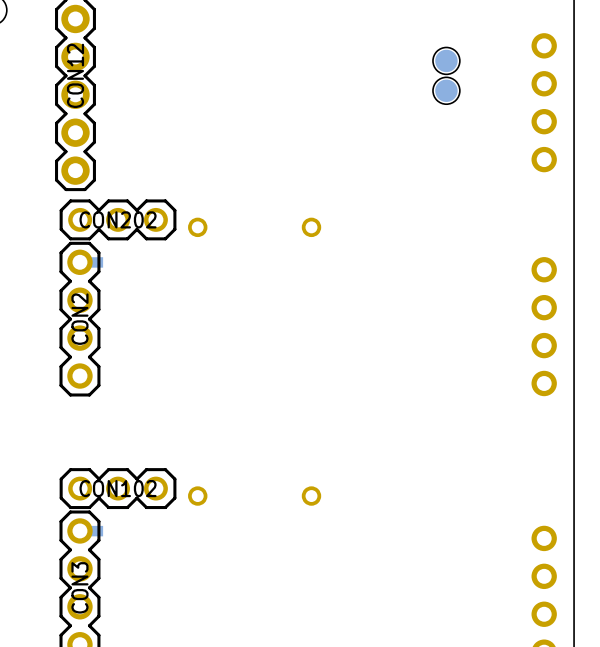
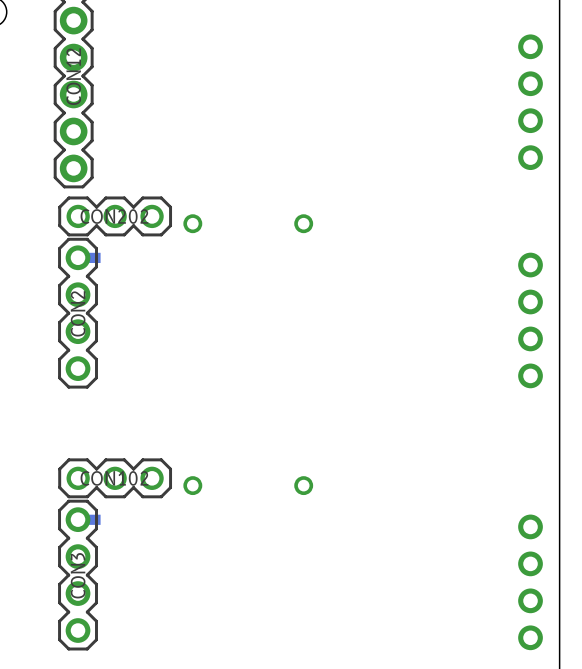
part: (446, 60) -> none
part: (446, 90) -> none

